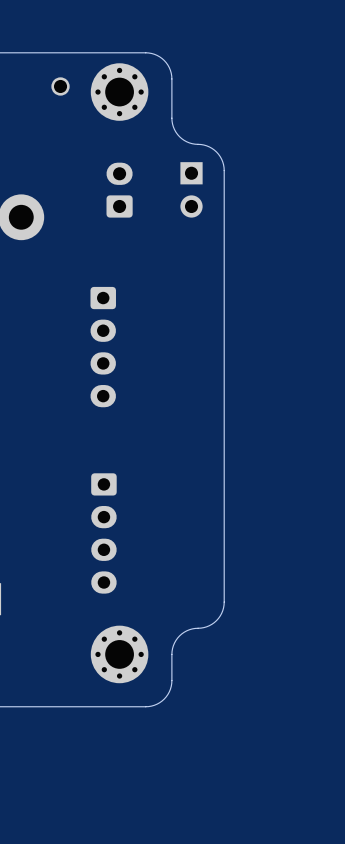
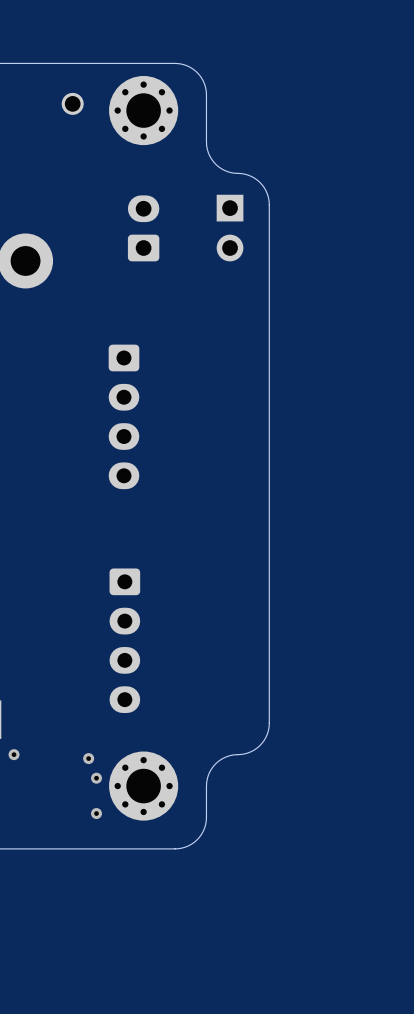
via: none -> (14, 754)
via: none -> (88, 758)
via: none -> (96, 778)
via: none -> (96, 813)

